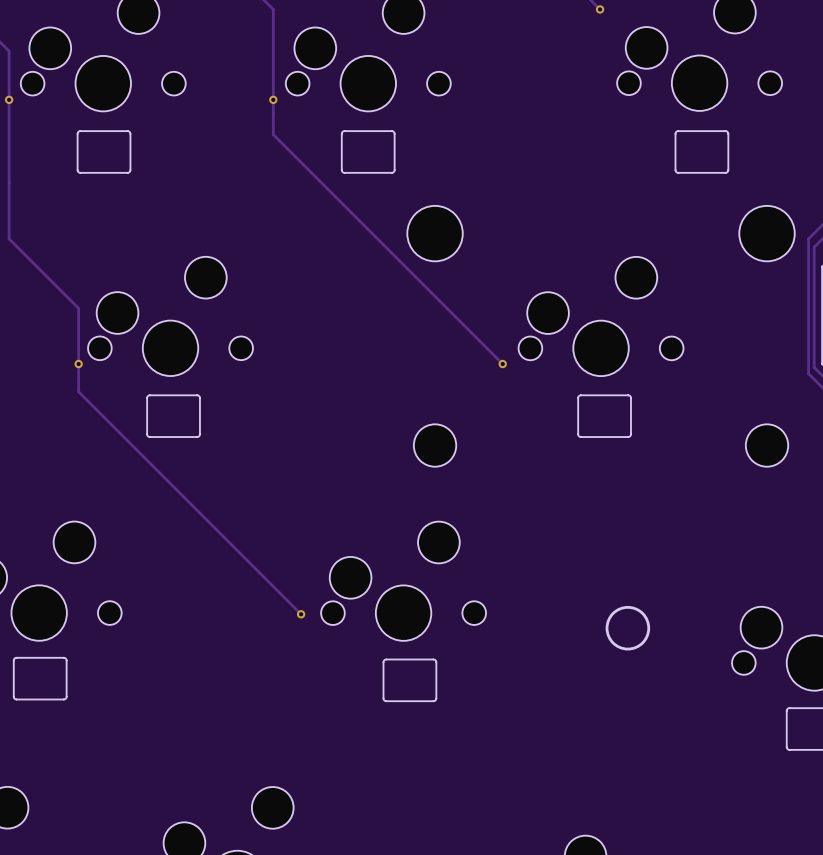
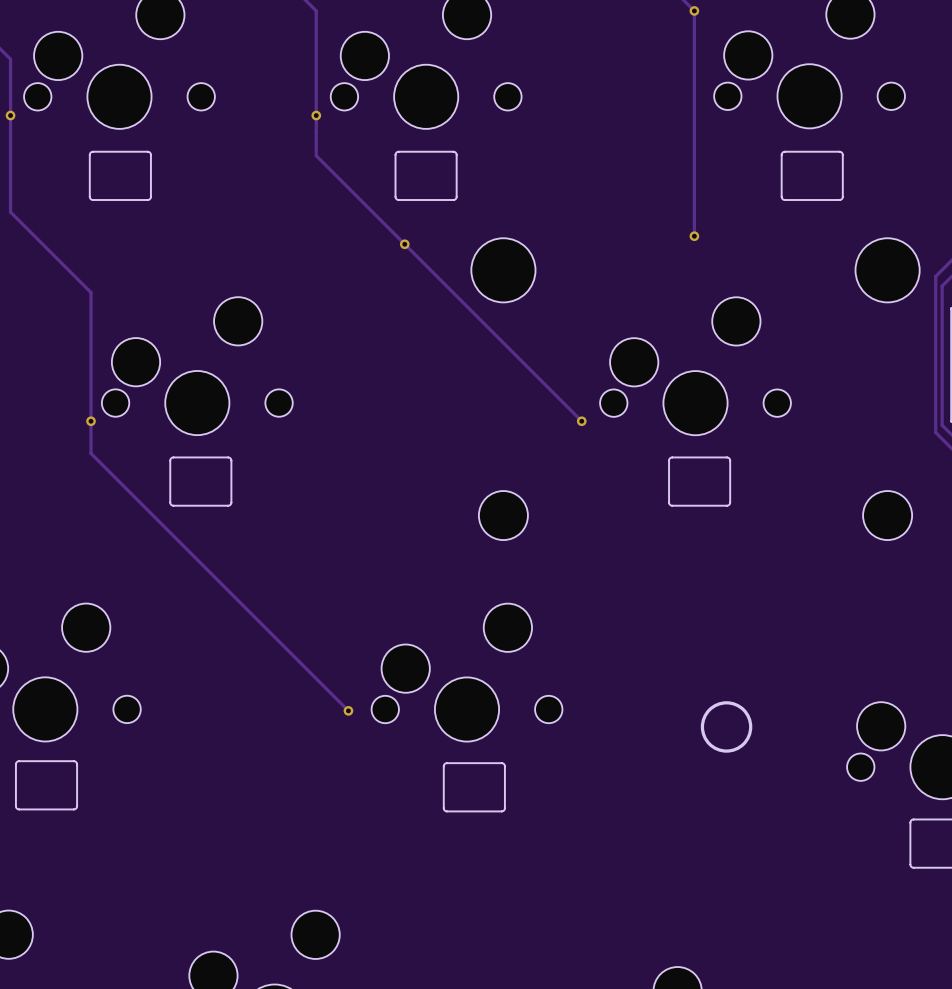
track: none -> (694, 10) (694, 236)
track: (9, 183) (9, 238) (78, 308) -> (10, 212) (91, 292) (91, 356)
via: none -> (694, 236)
via: none -> (404, 244)

